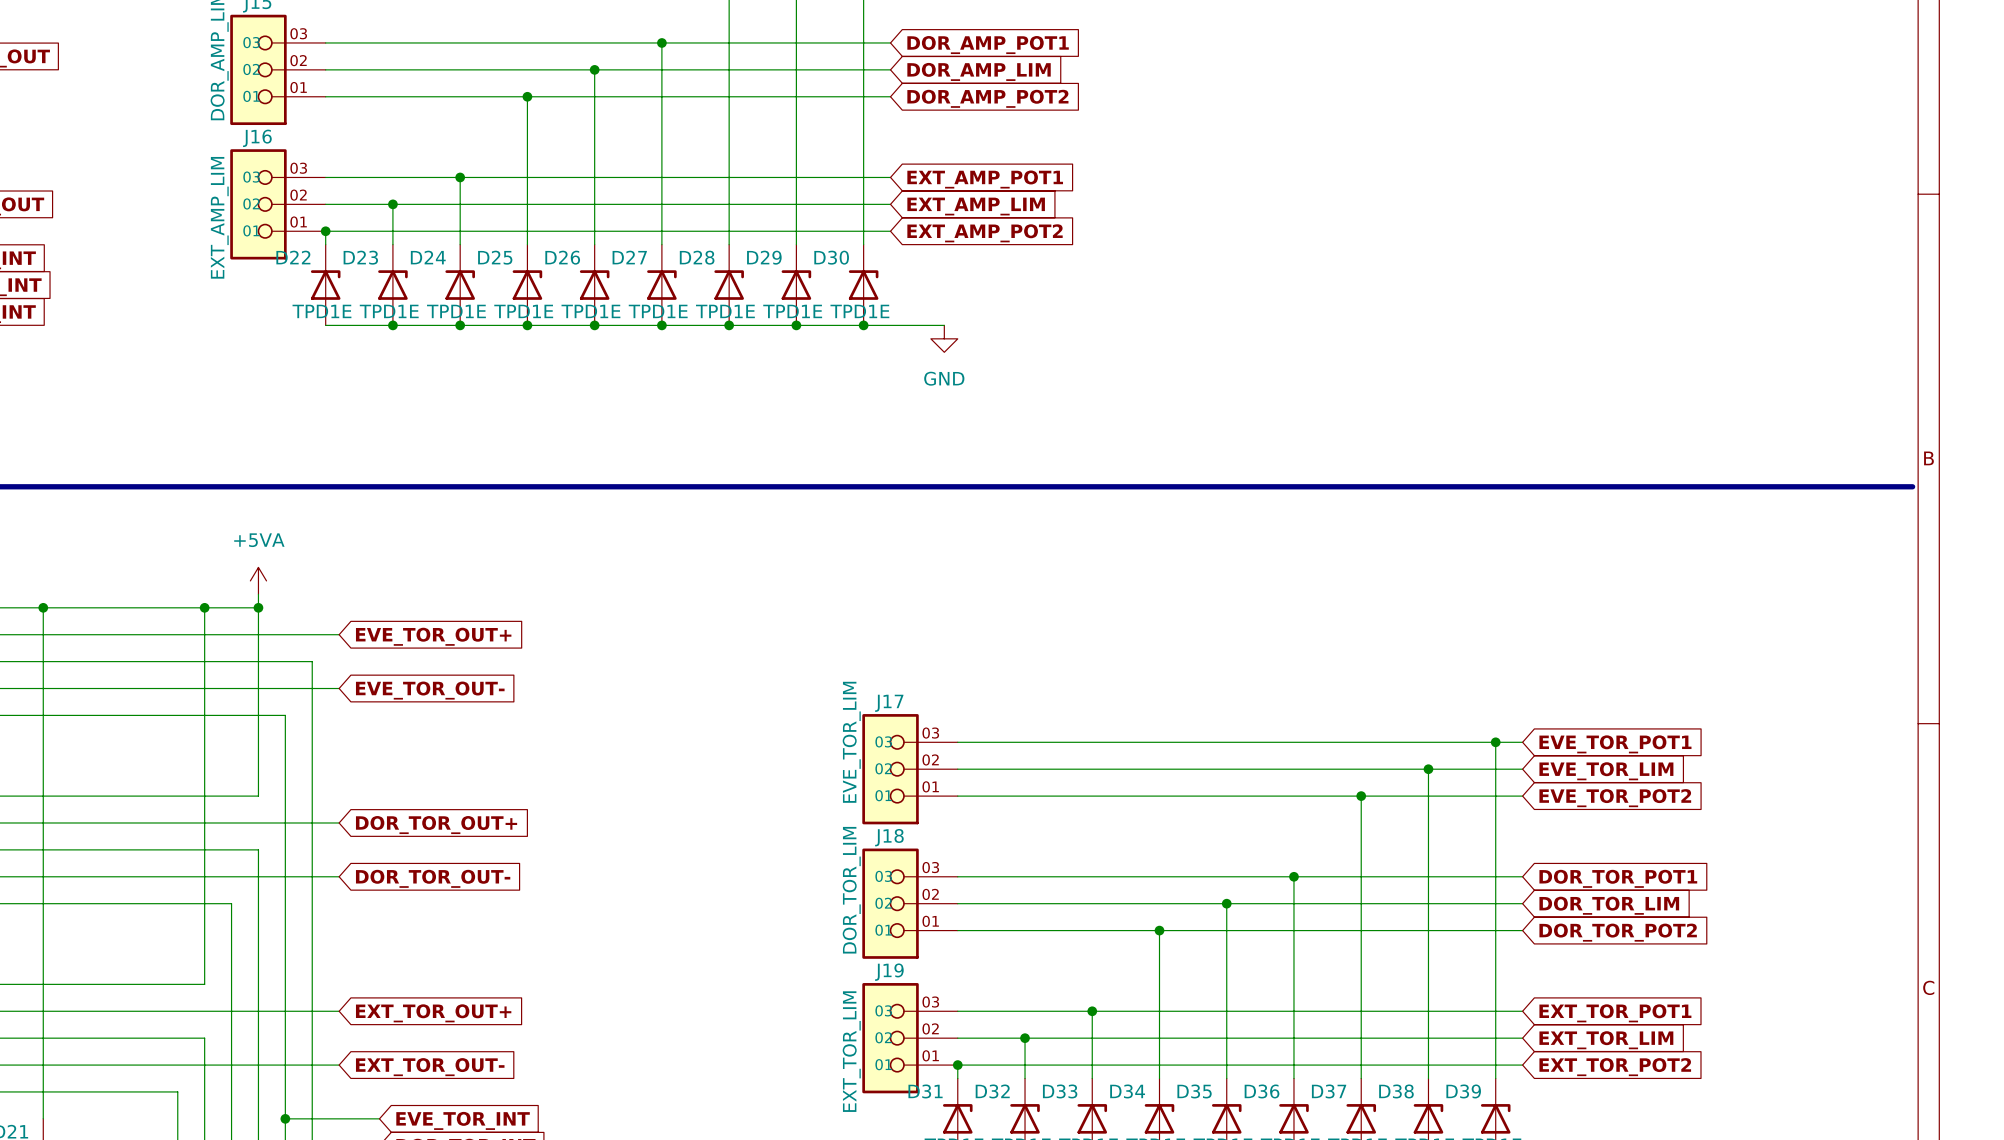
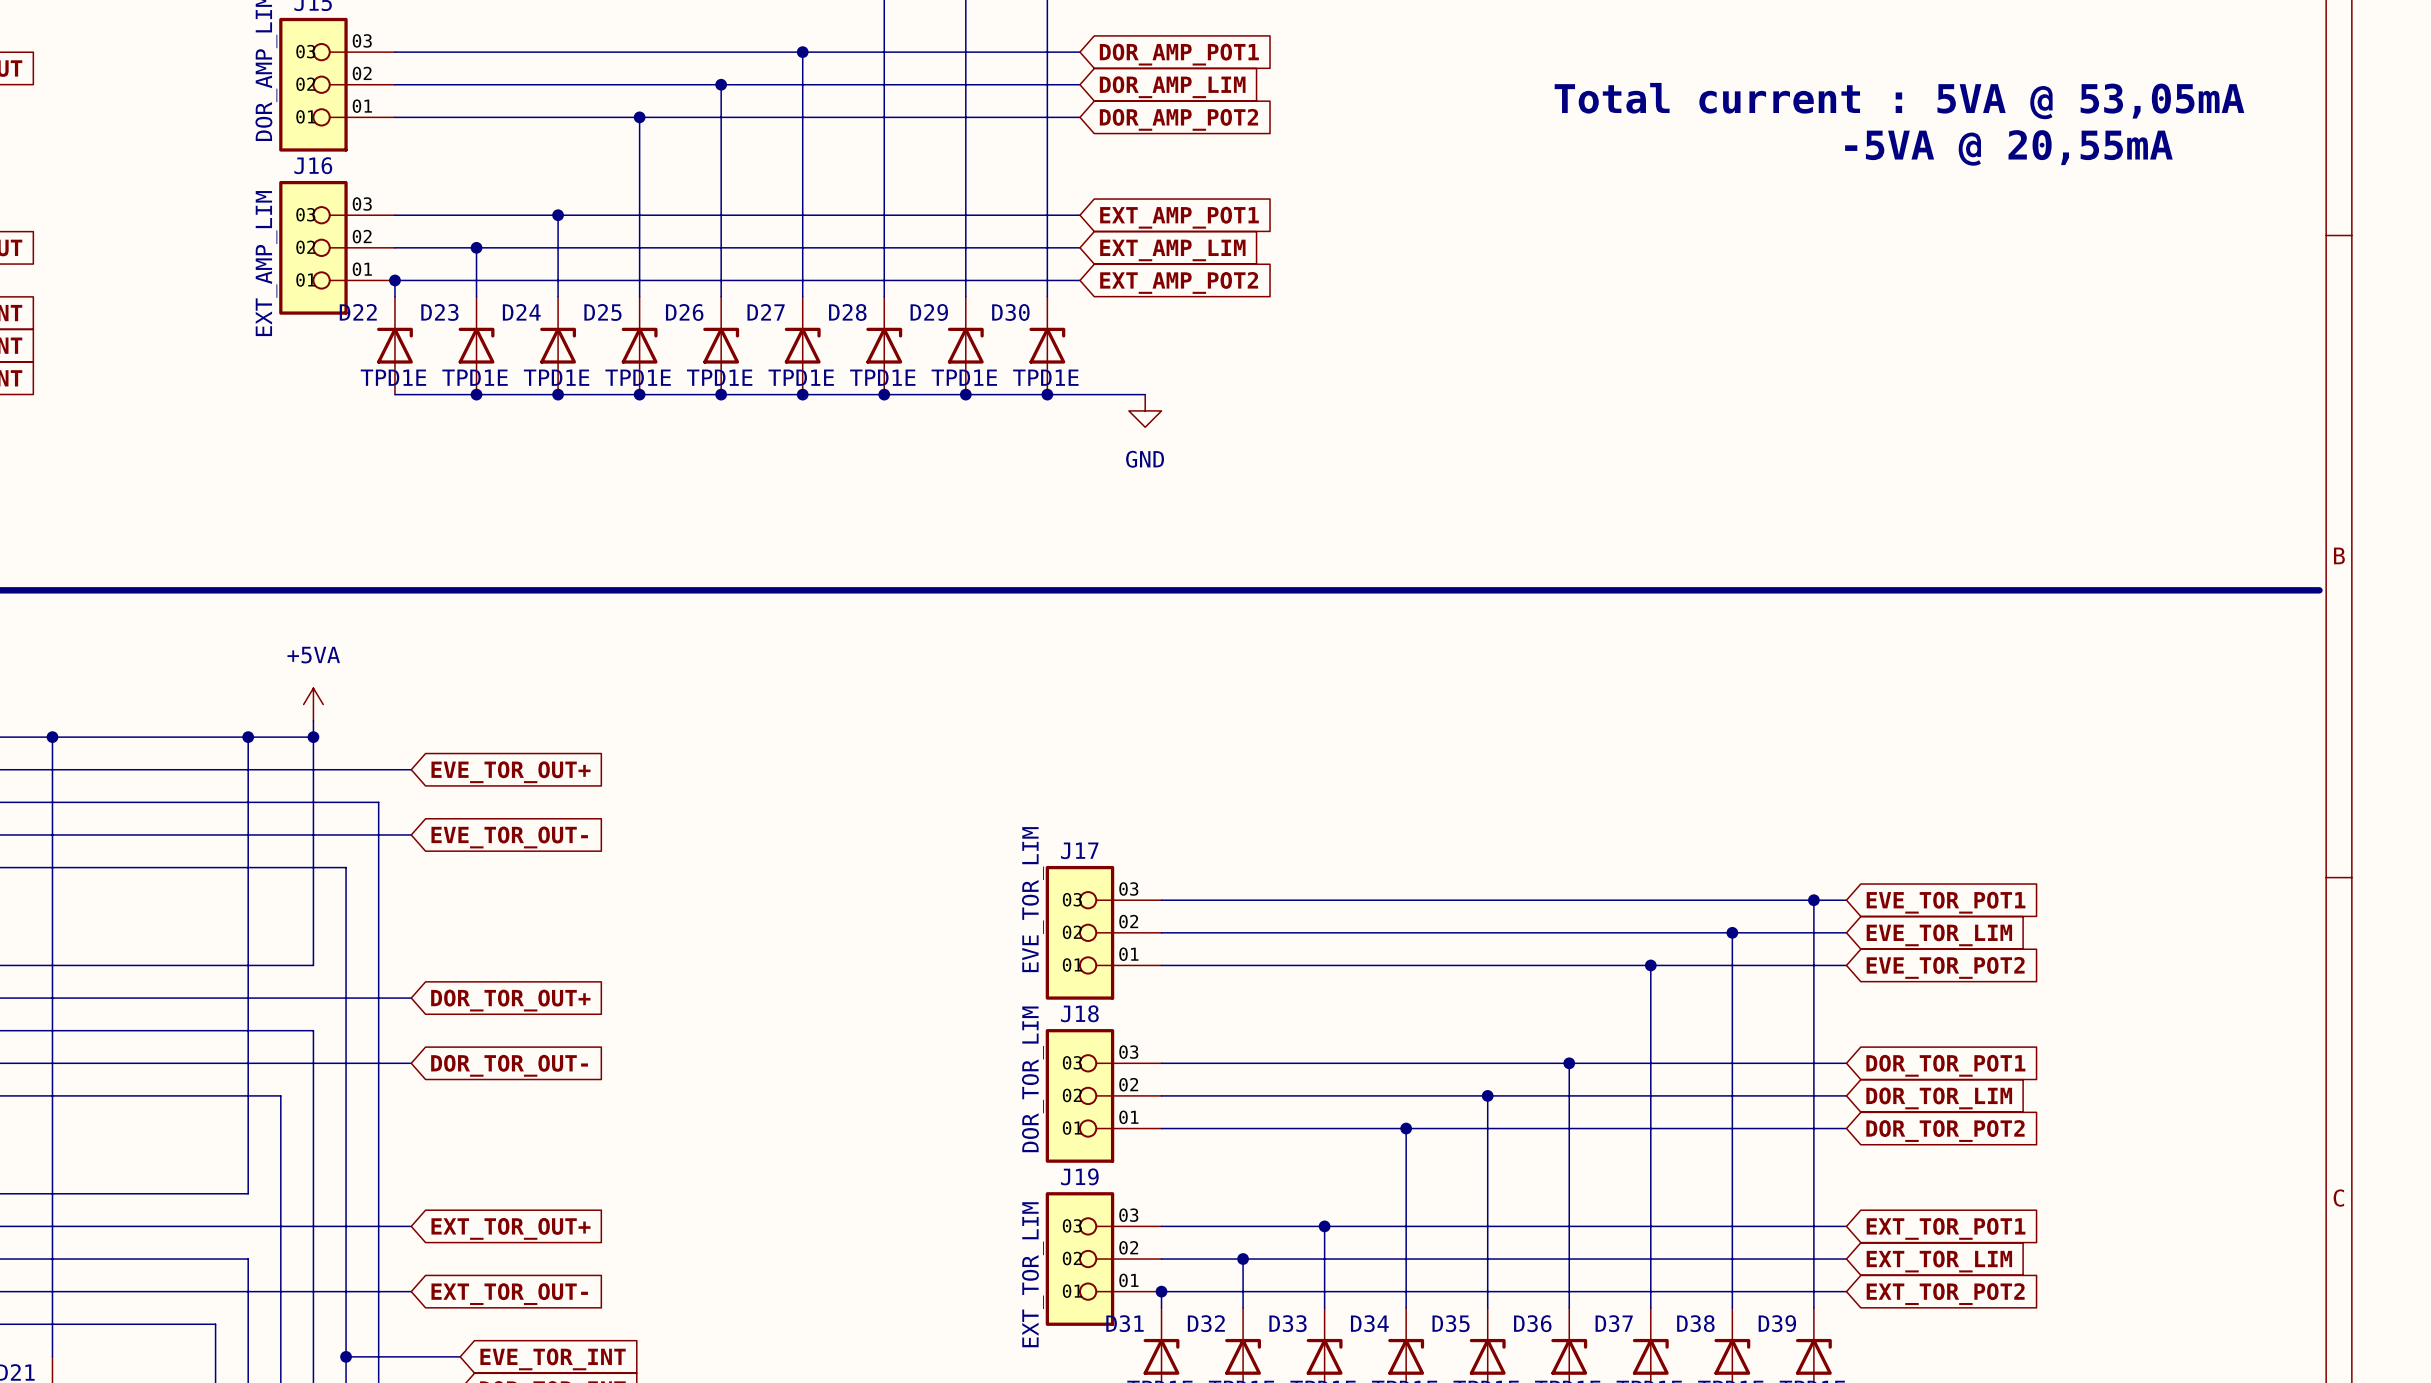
text: none -> Total current : 5VA @ 53,05mA (1899, 101)
text: none -> -5VA @ 20,55mA (2008, 147)

